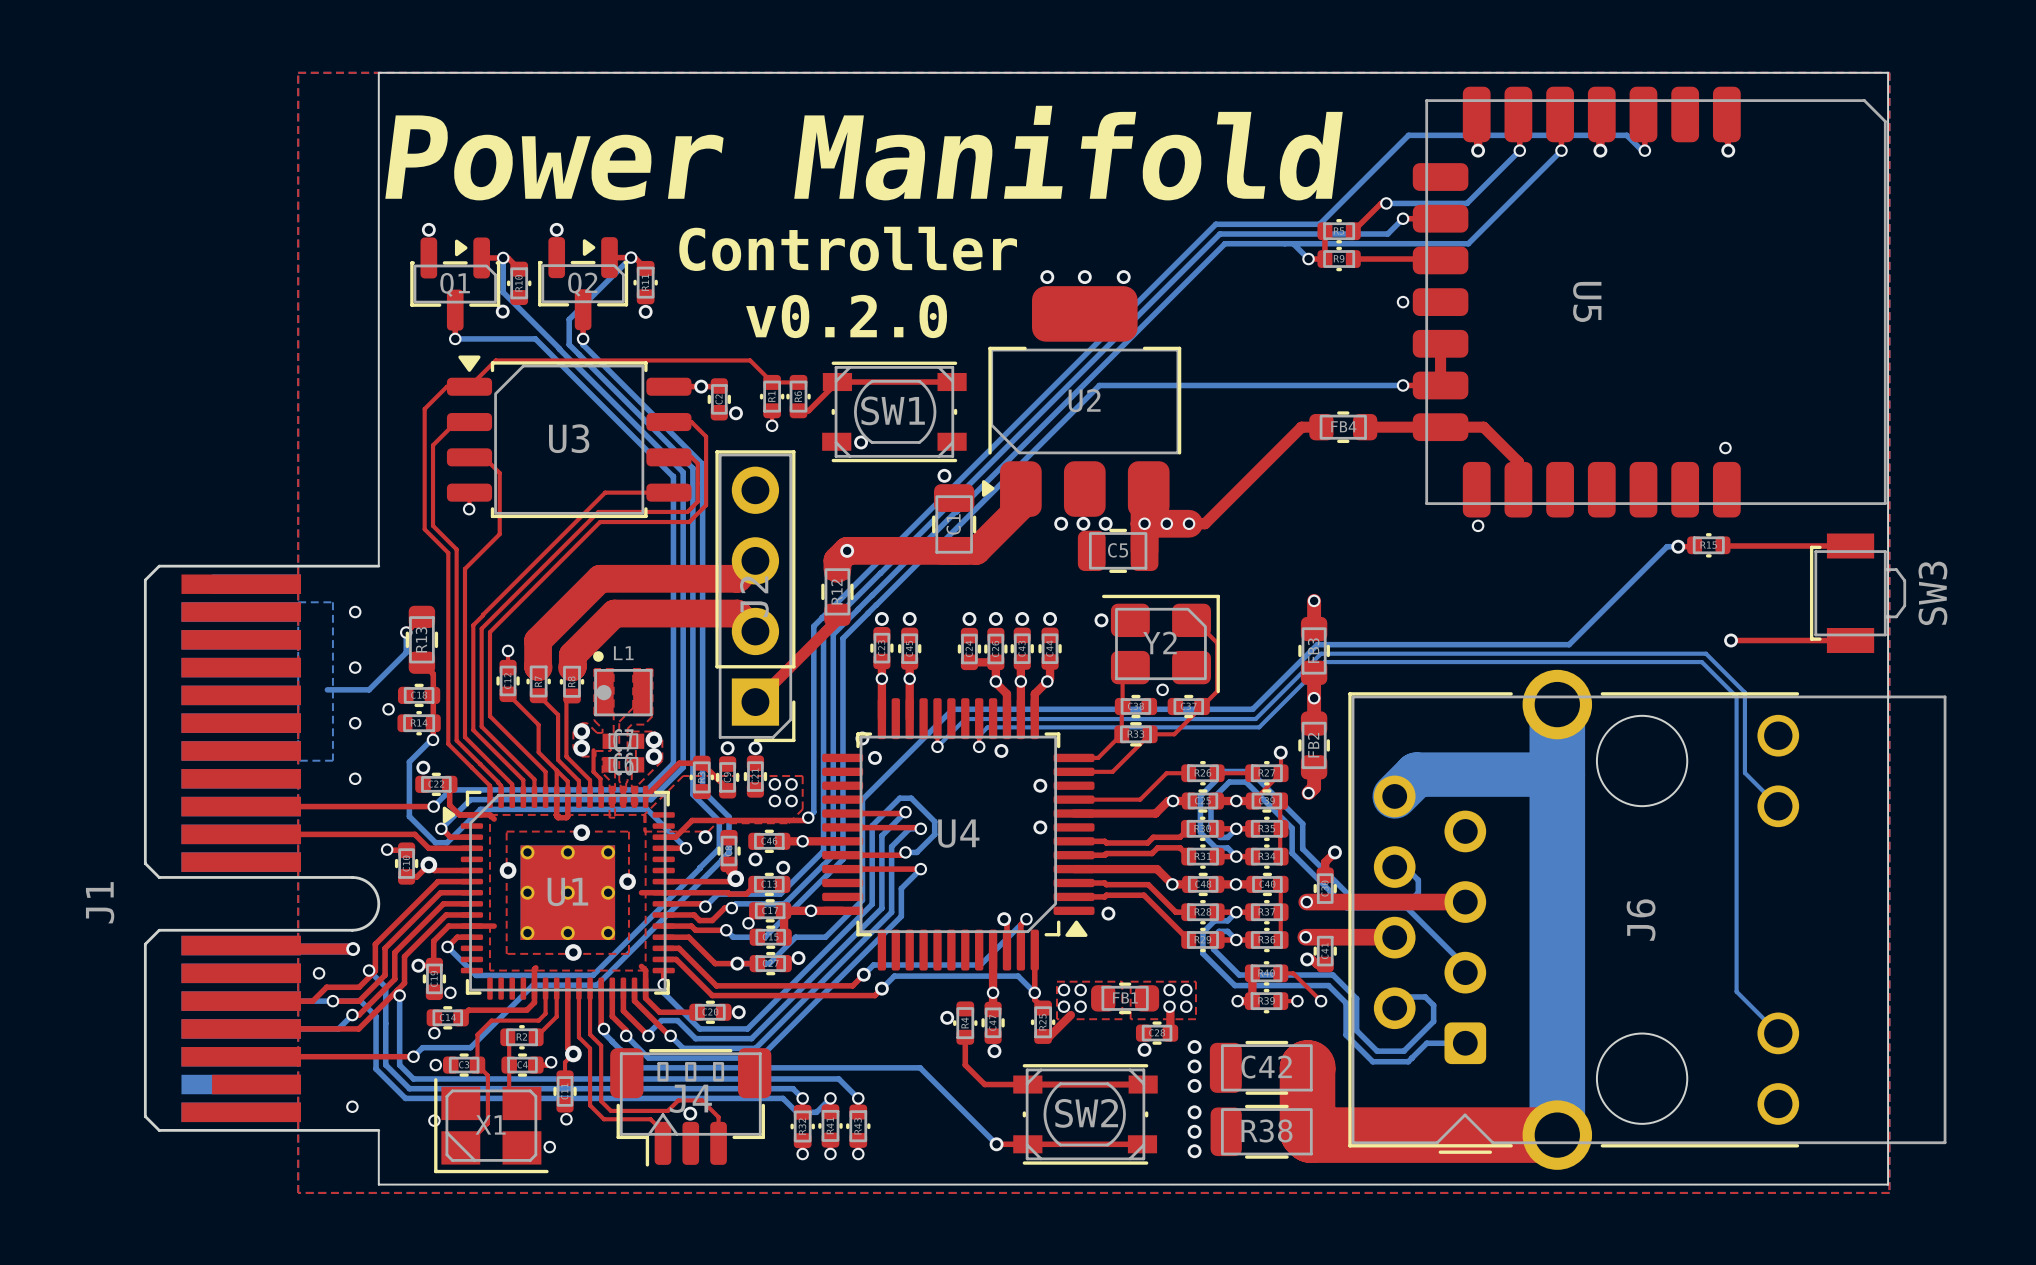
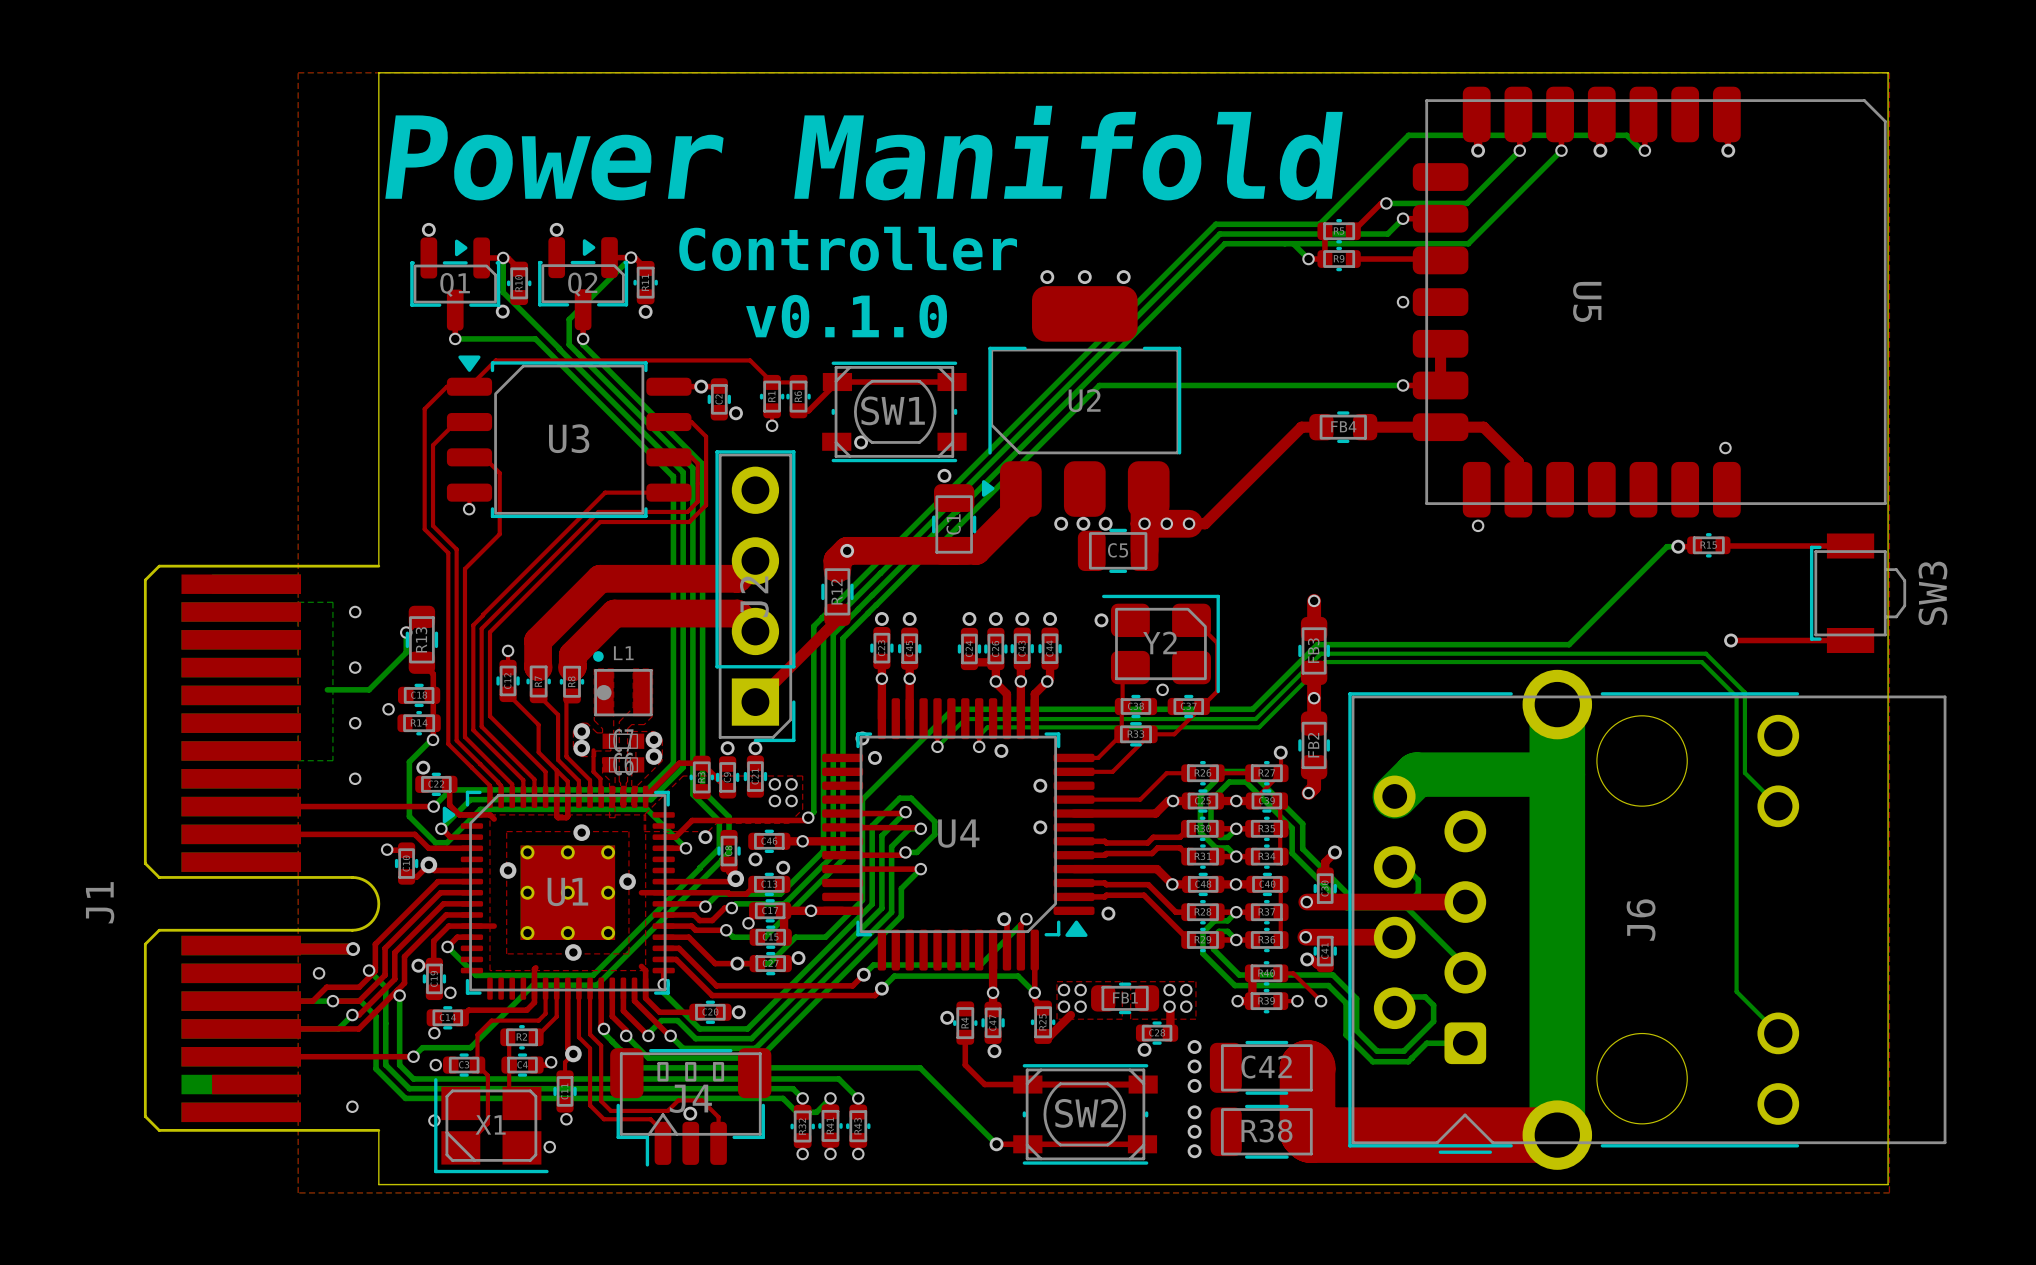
text: v0.2.0 (846, 316) -> v0.1.0 (846, 316)

